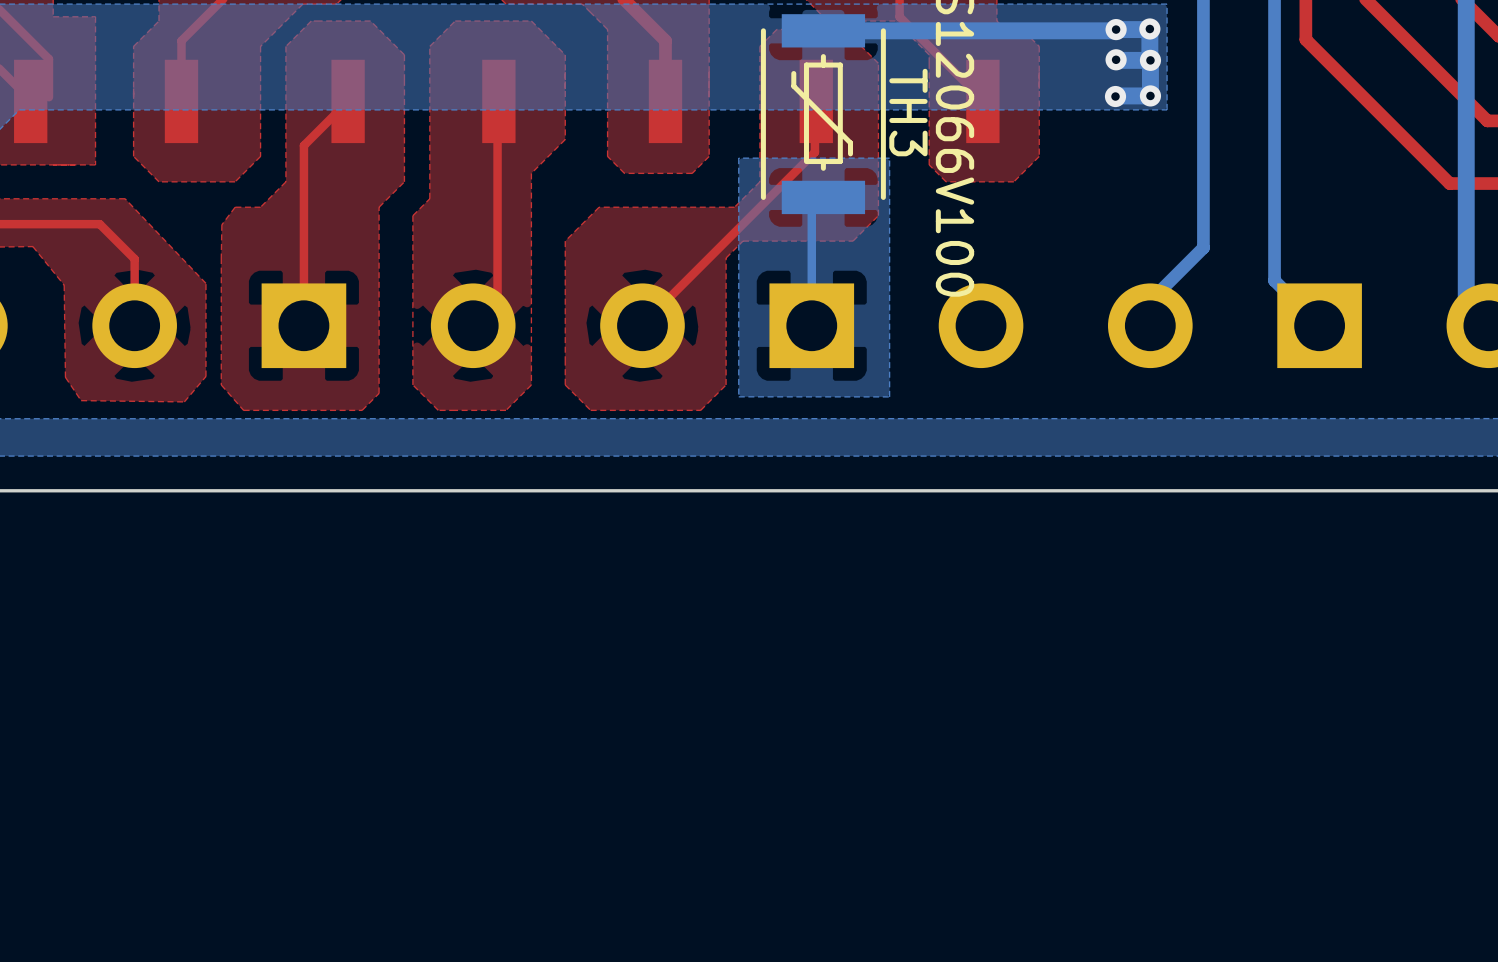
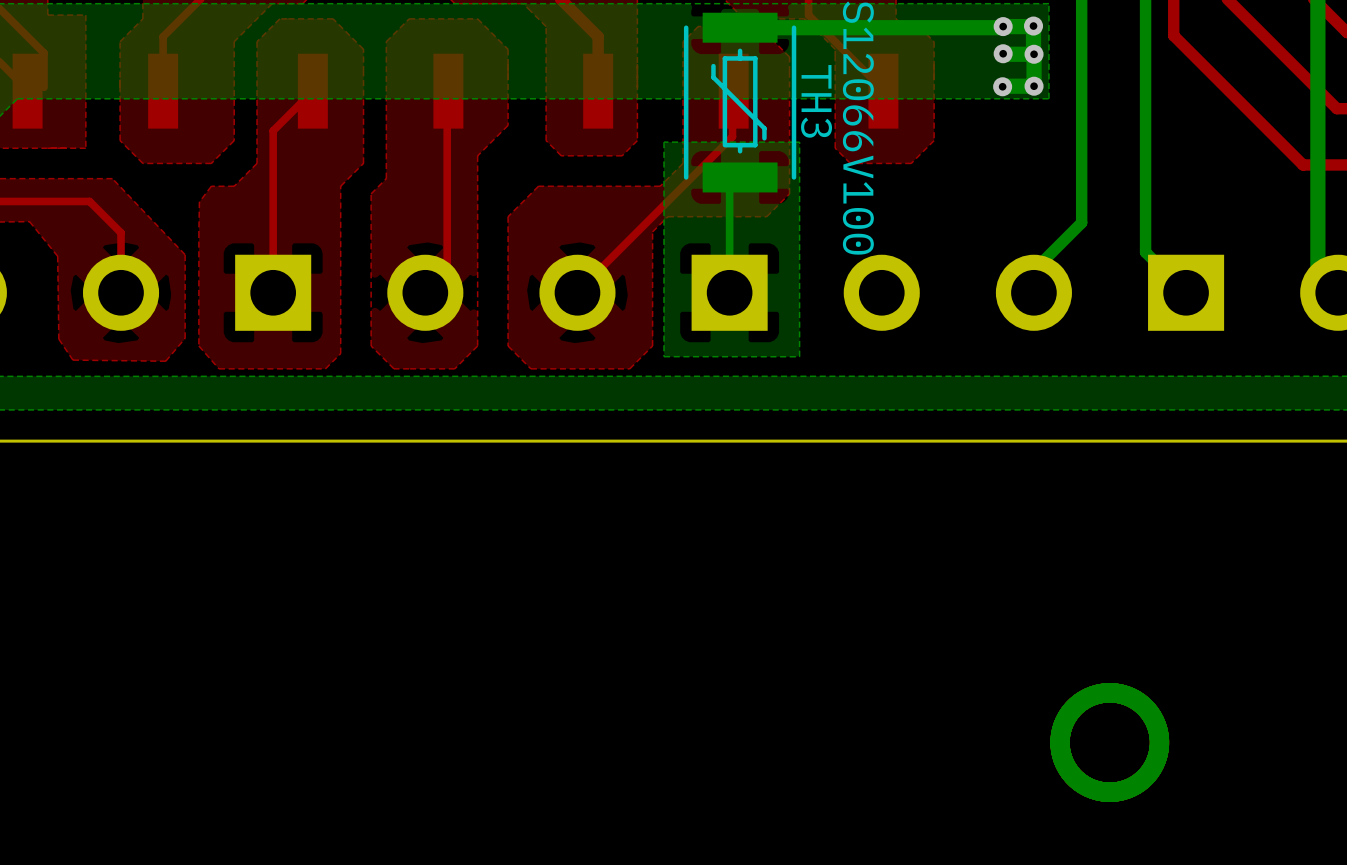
drawing: none -> [1050, 683, 1170, 802]

